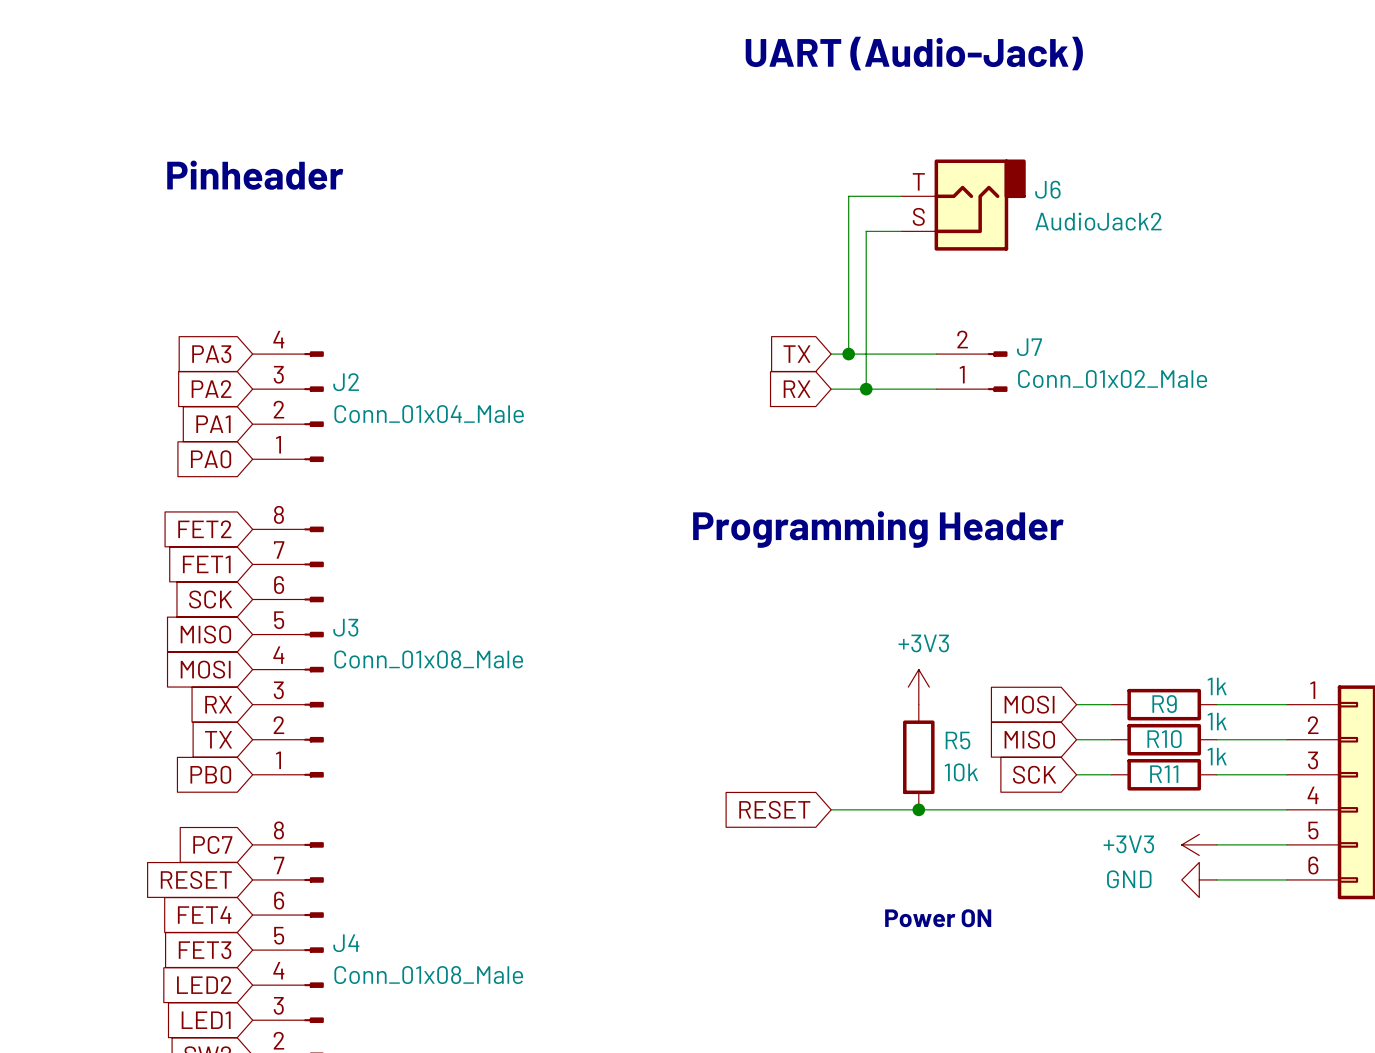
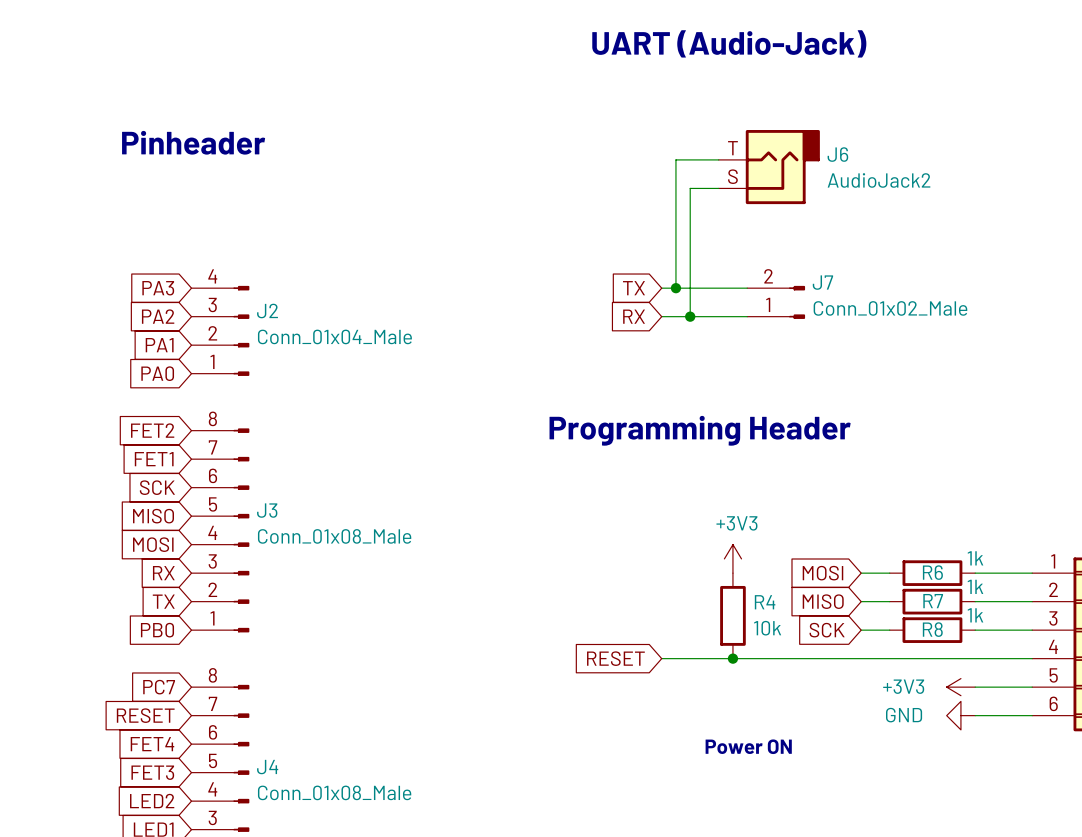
R9 name: R9 (1164, 704) -> R6 (932, 572)
R10 name: R10 (1164, 739) -> R7 (933, 601)
R5 name: R5 (958, 740) -> R4 (765, 602)
R11 name: R11 (1164, 774) -> R8 (932, 629)

